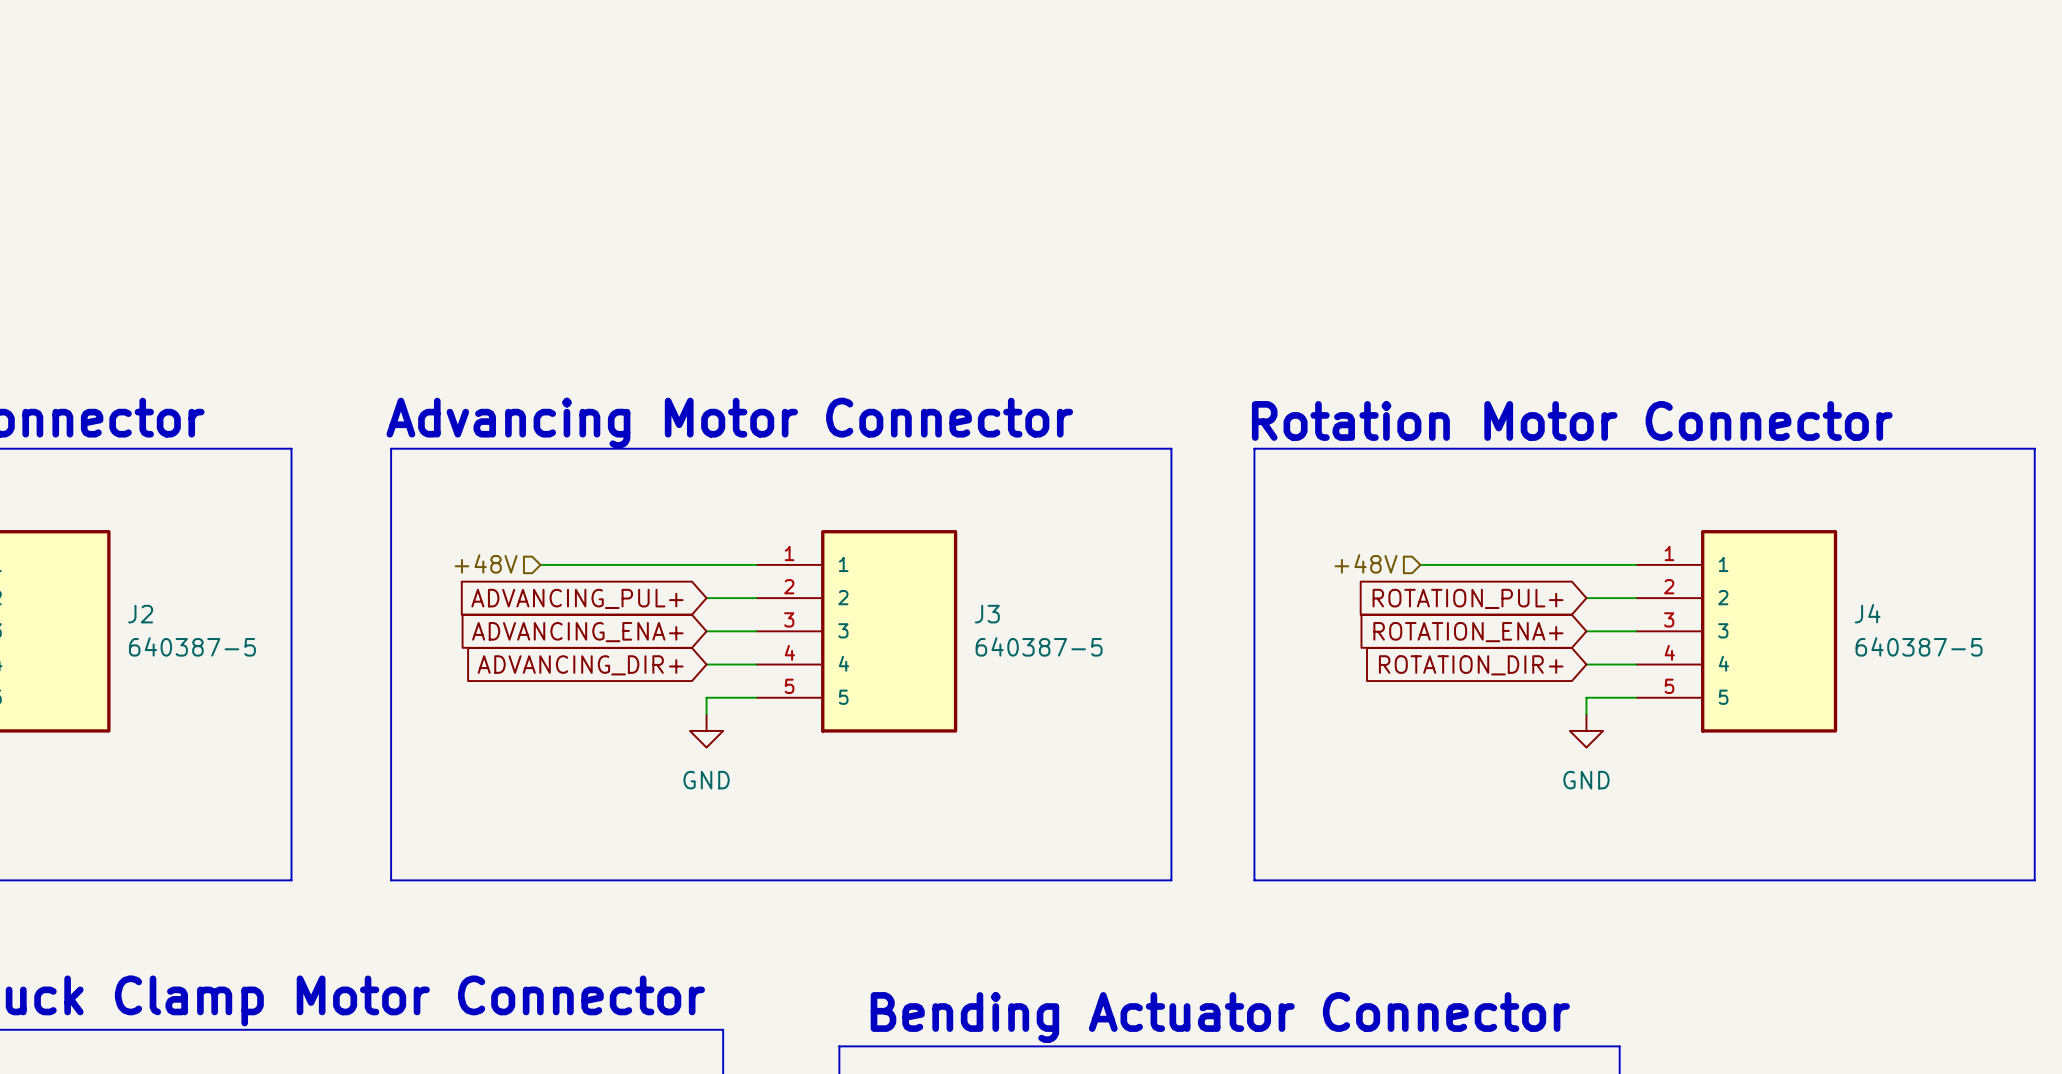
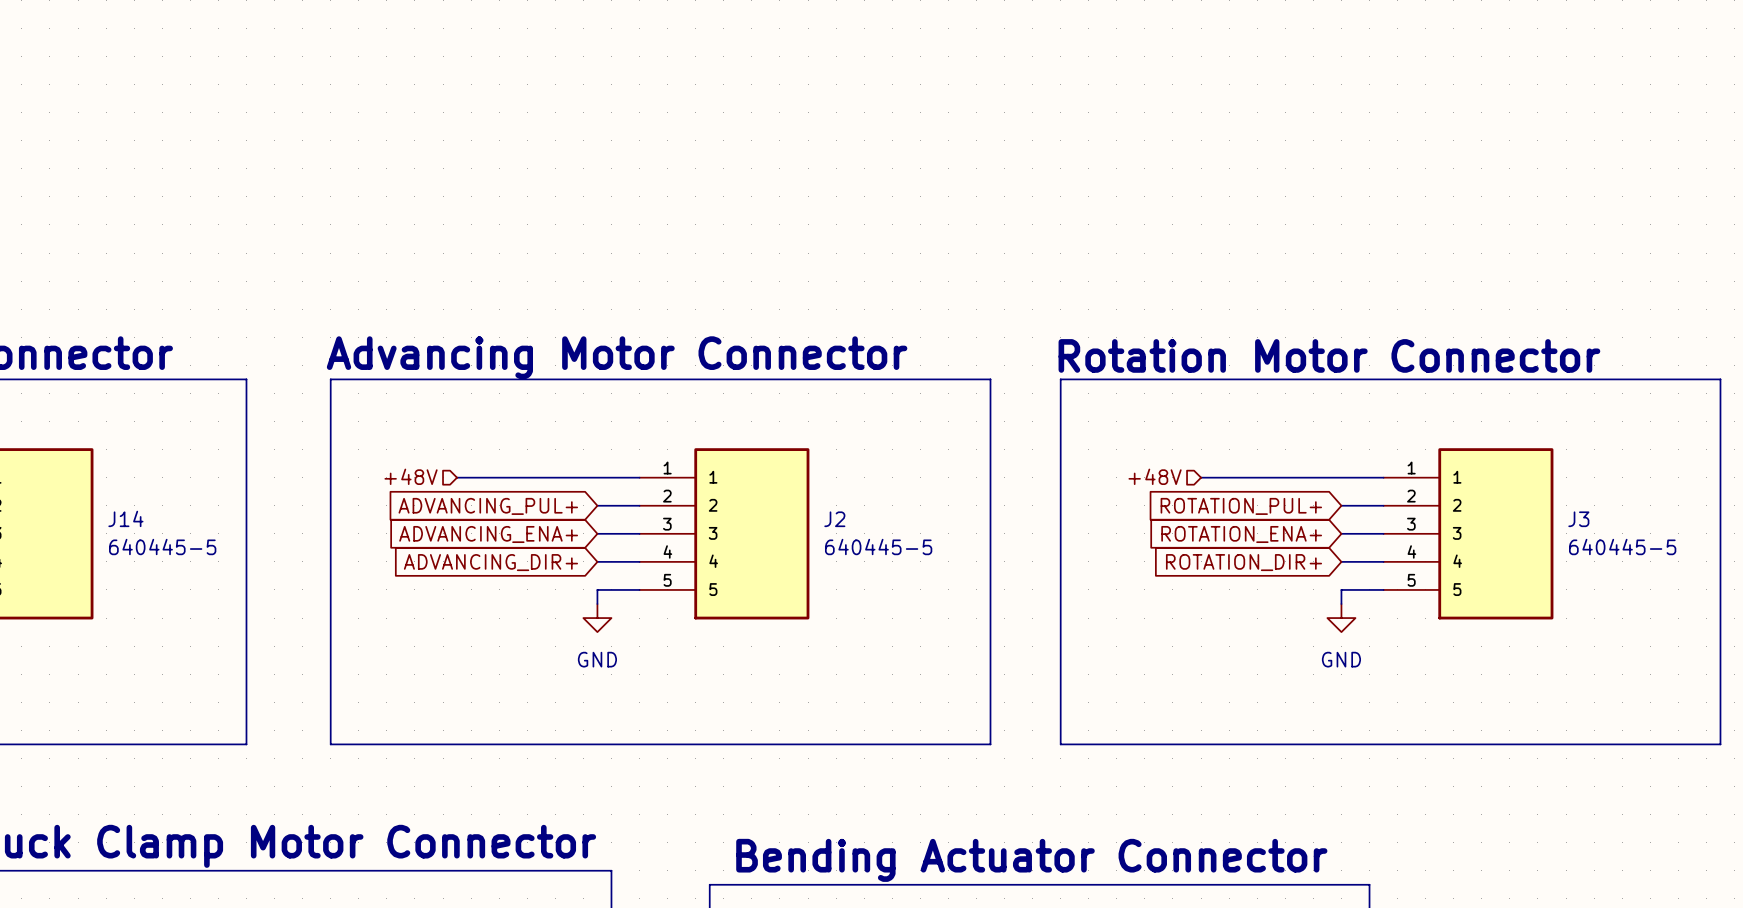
J4 name: J4 (1867, 613) -> J3 (1578, 519)
J2 name: J2 (140, 614) -> J14 (125, 518)
J3 name: J3 (987, 614) -> J2 (834, 519)
J2 value: 640387-5 (192, 646) -> 640445-5 (162, 547)
J3 value: 640387-5 (1039, 646) -> 640445-5 (878, 547)
J4 value: 640387-5 (1919, 646) -> 640445-5 (1622, 547)

